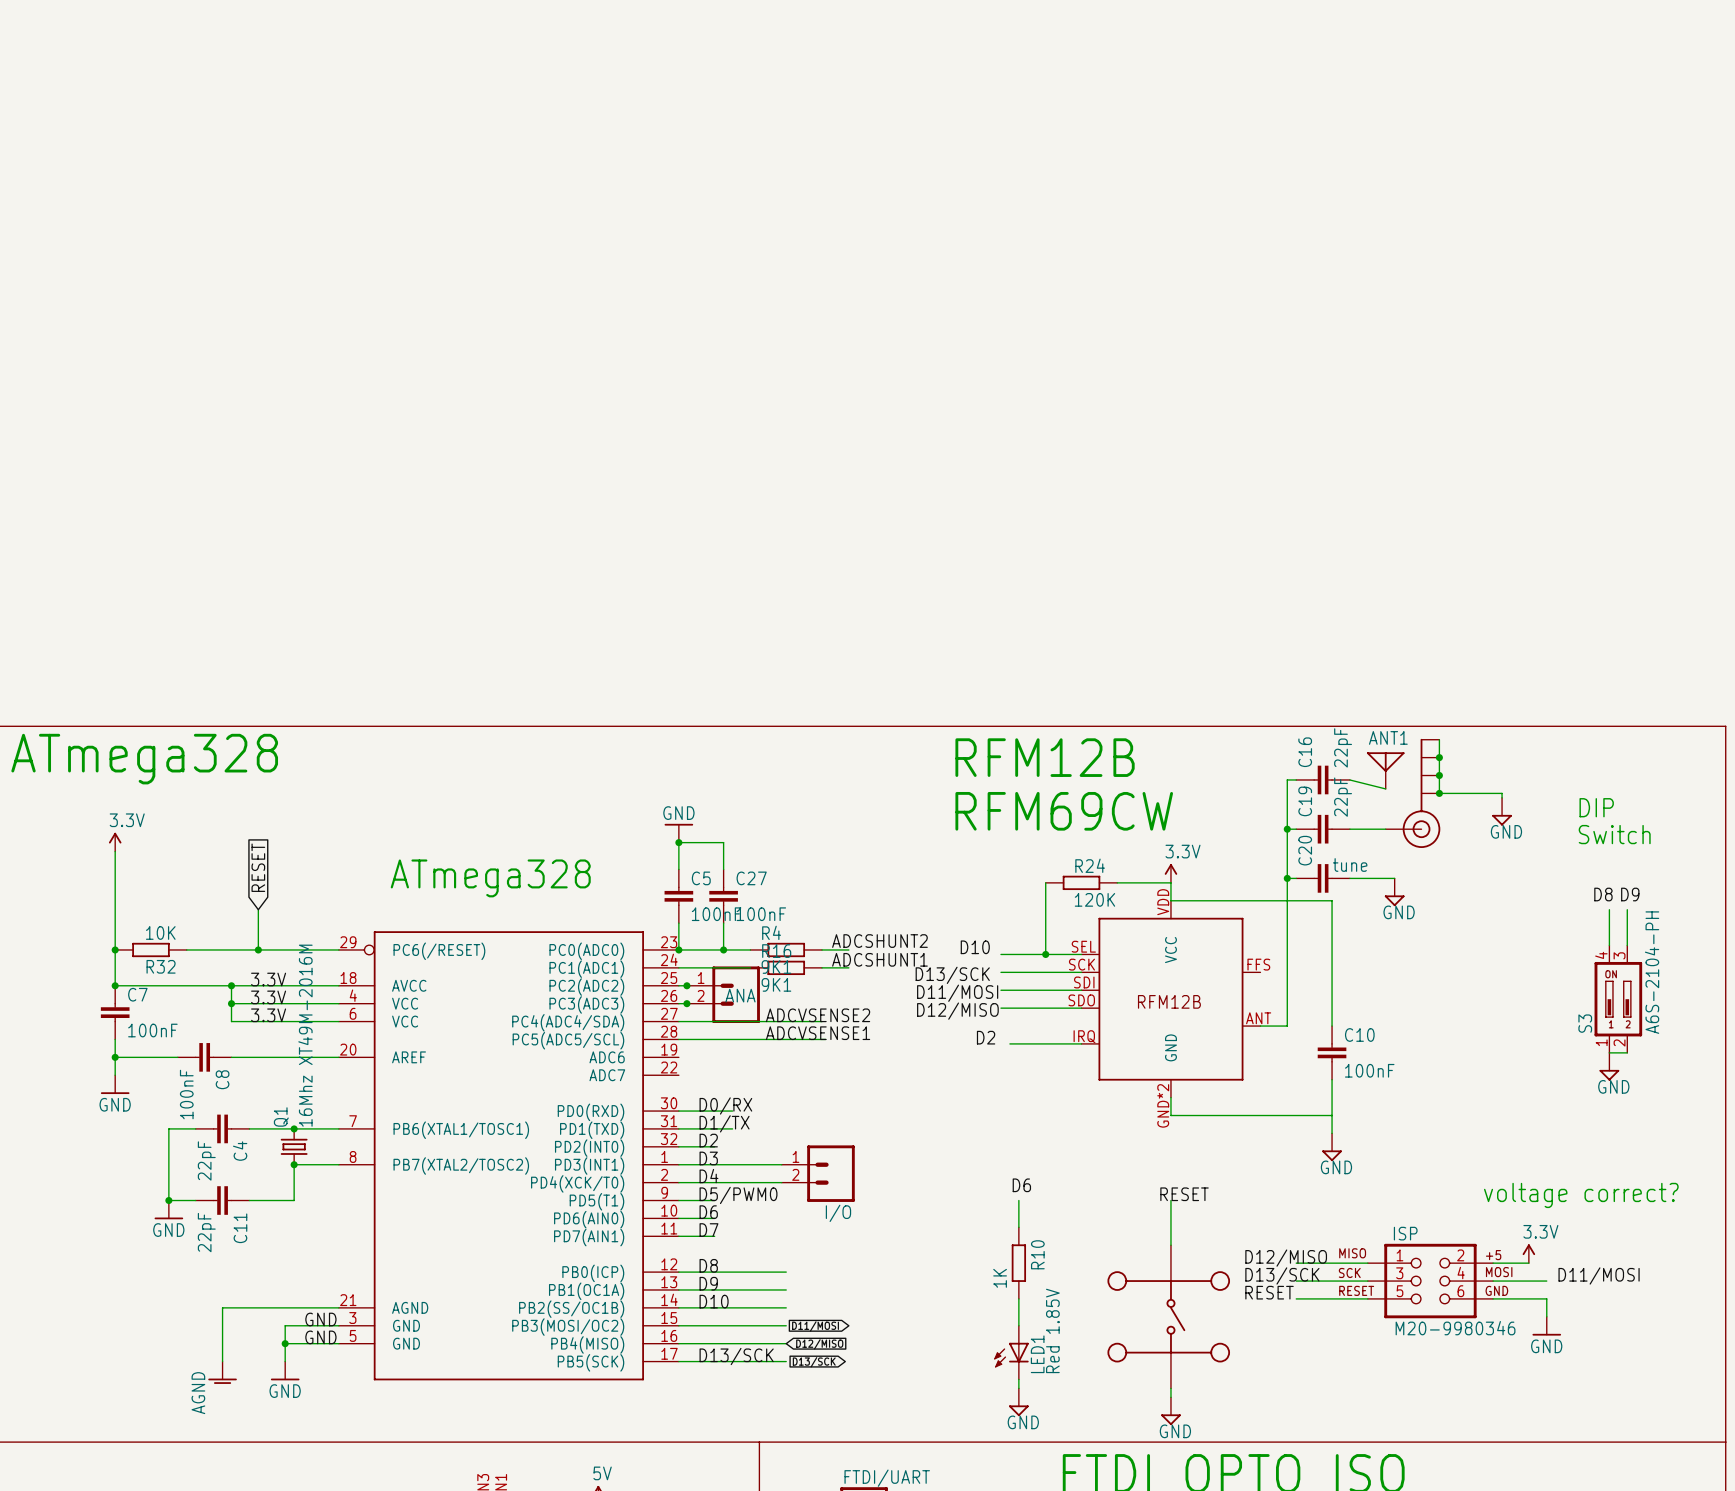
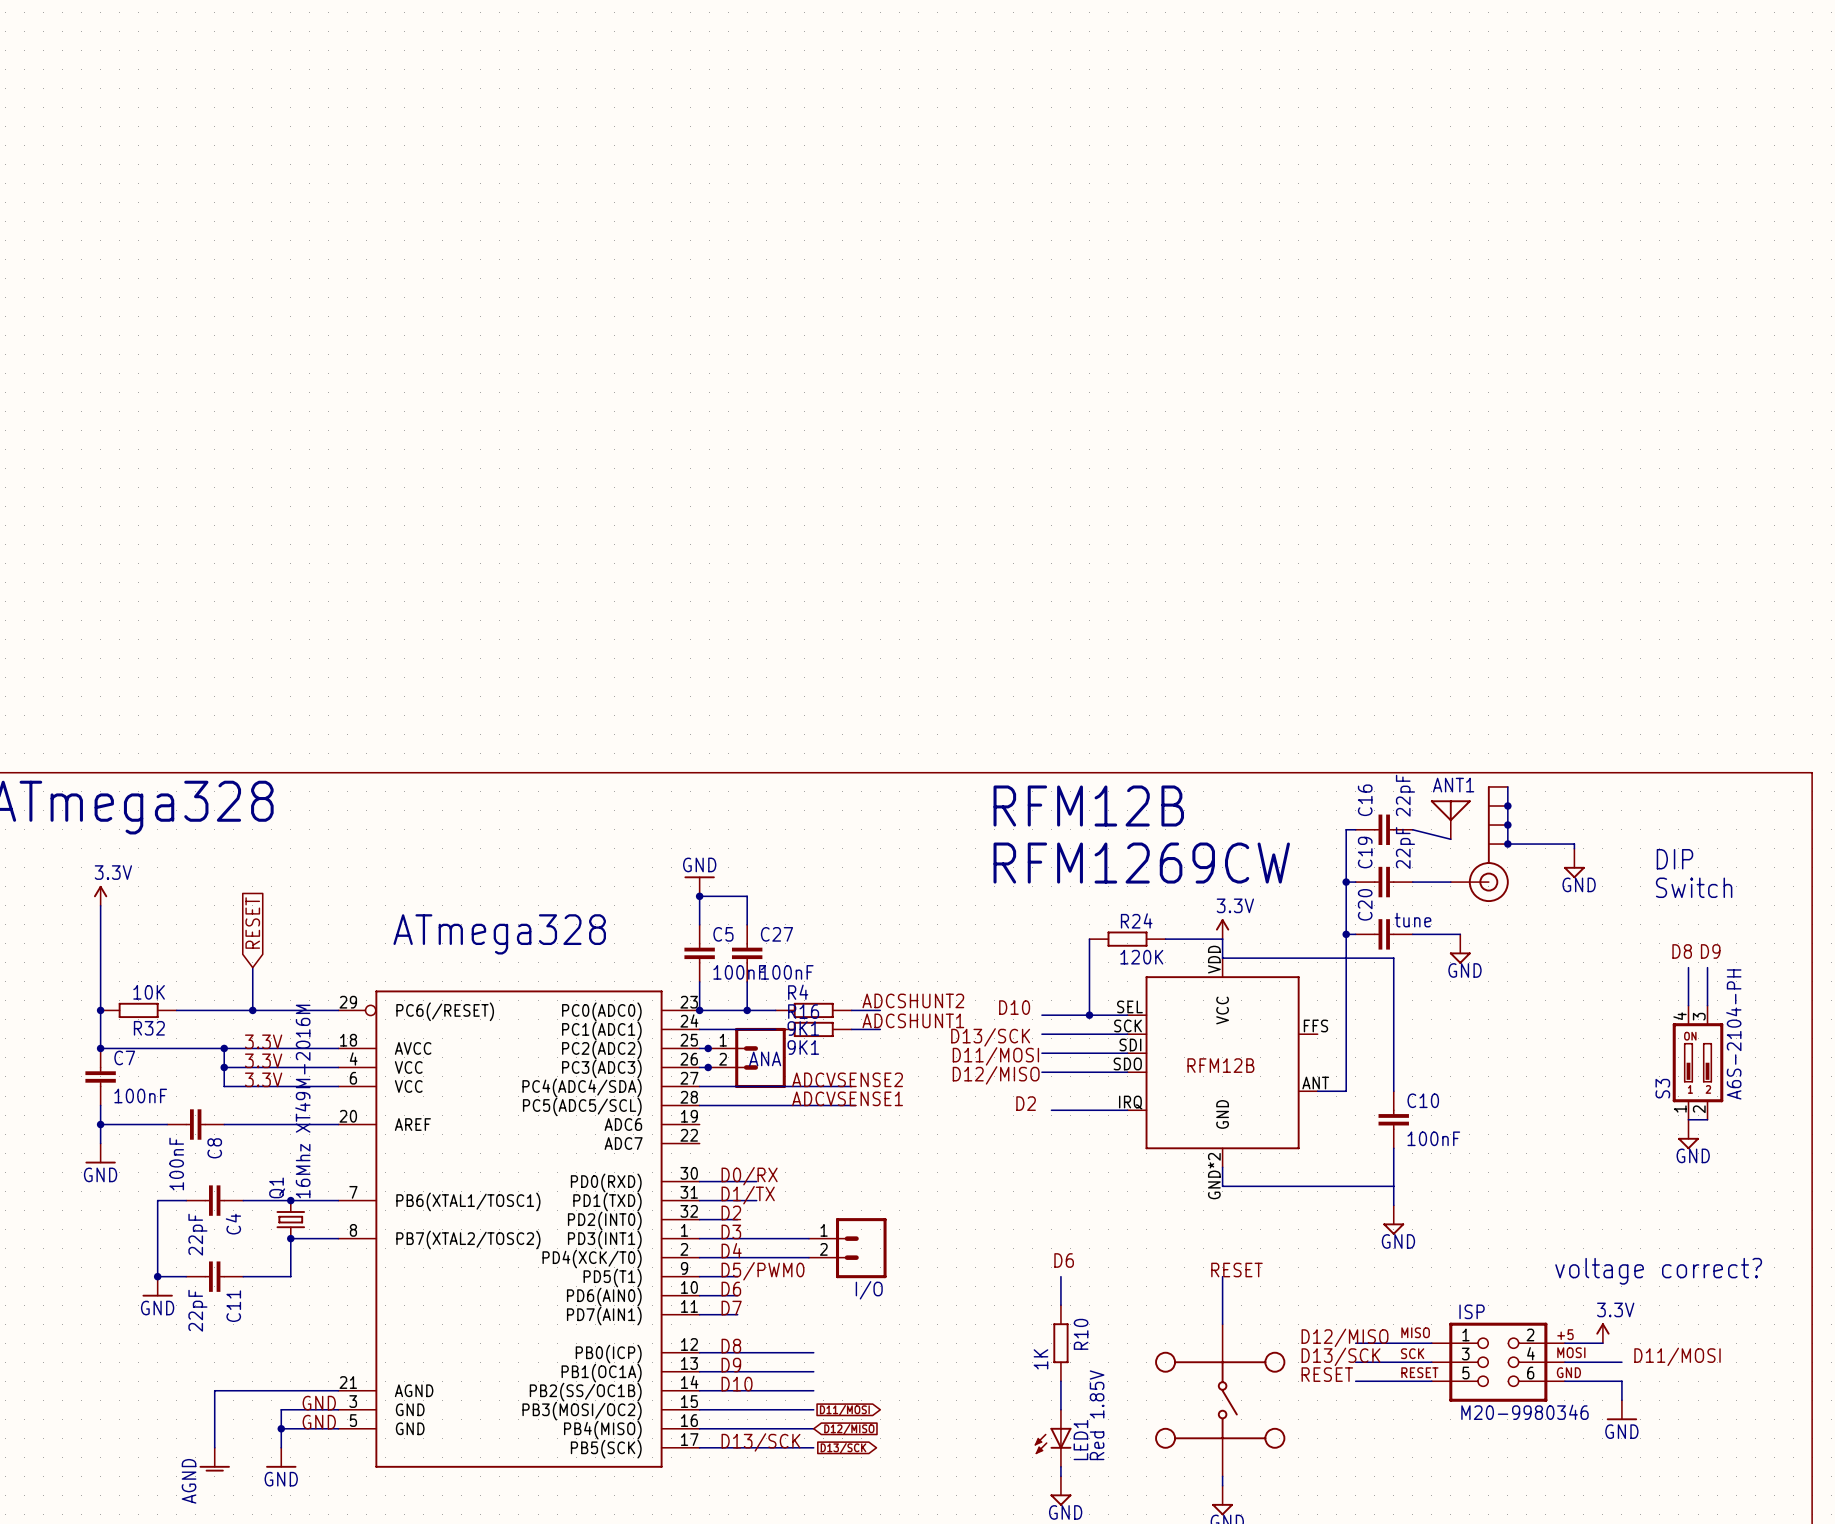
text: RFM69CW (1064, 811) -> RFM1269CW (1141, 863)

